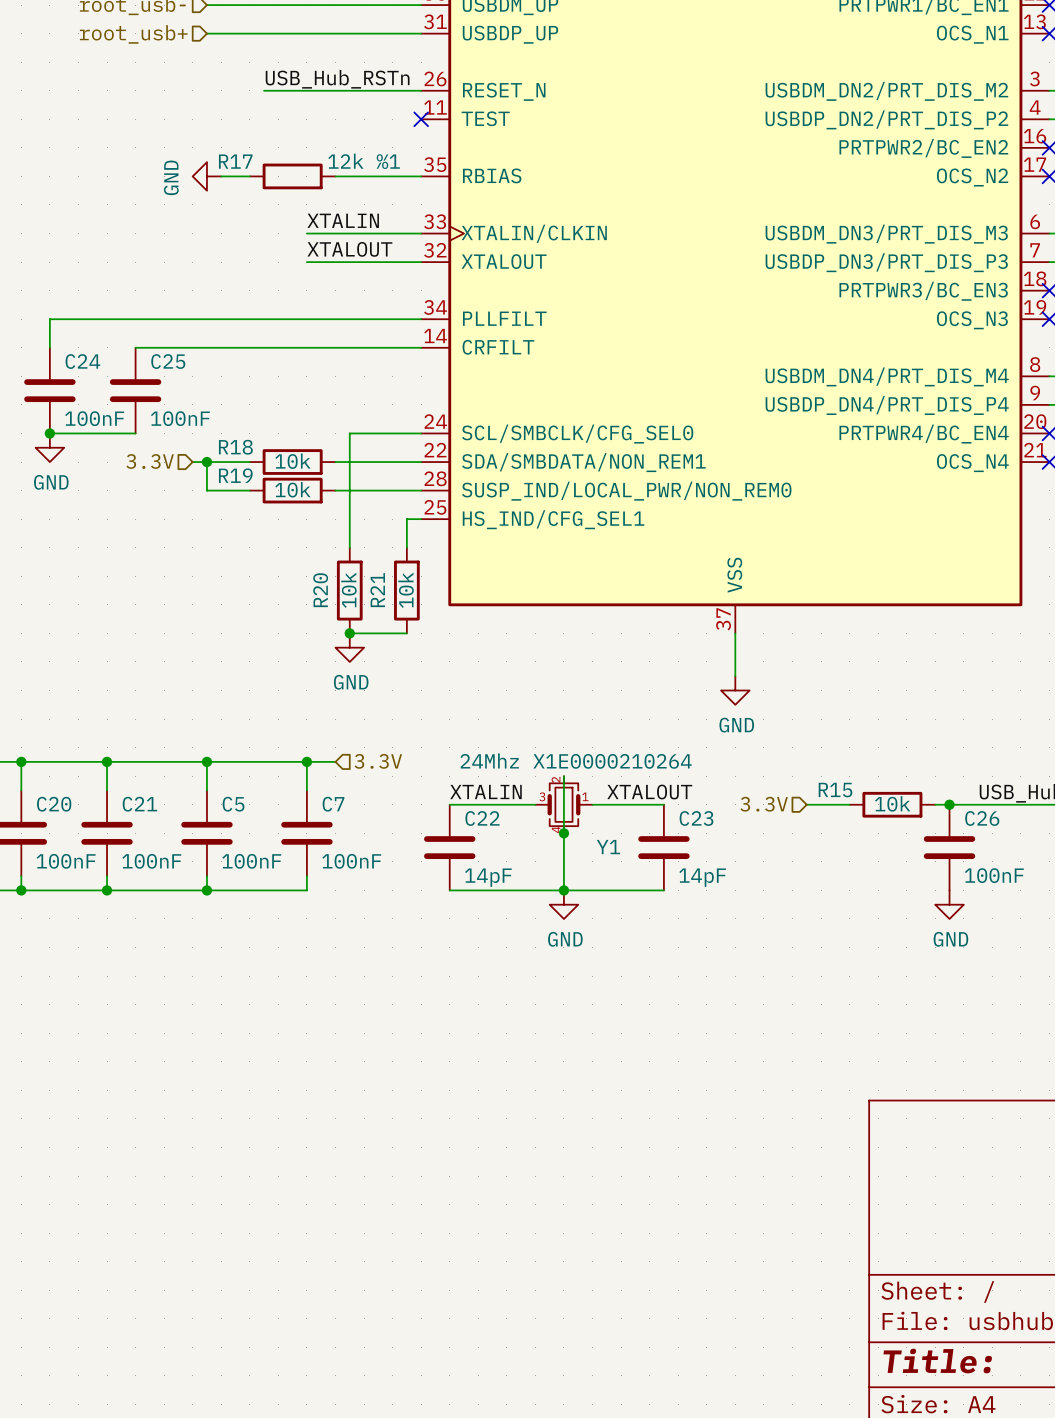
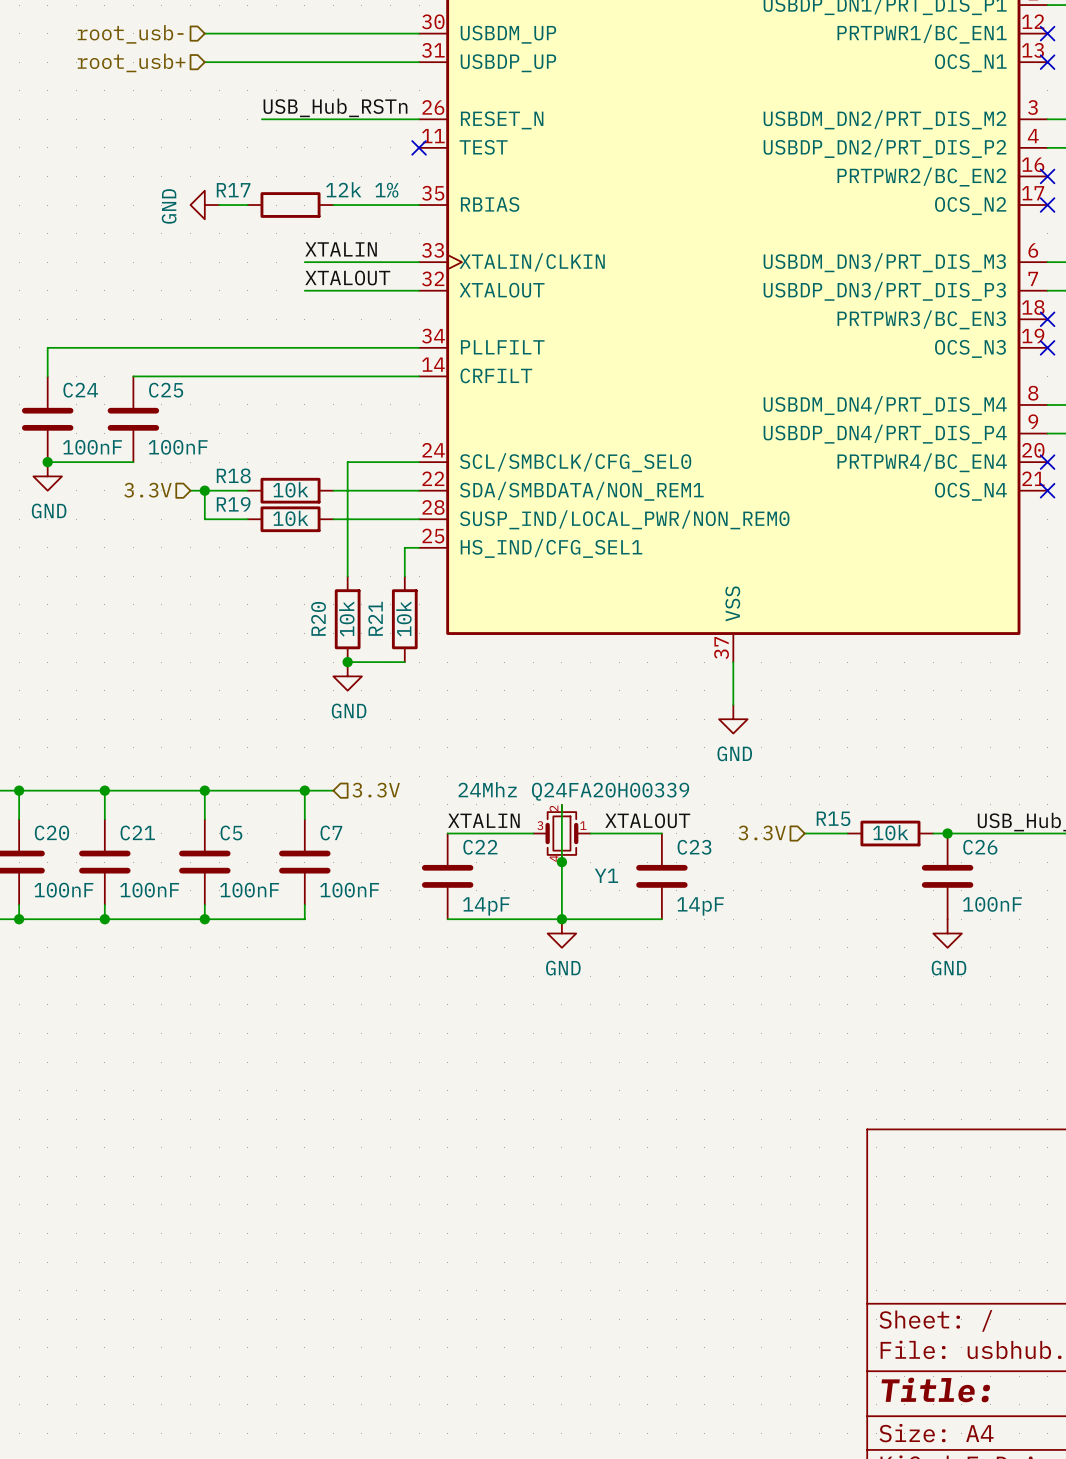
R17 value: 12k %1 (364, 161) -> 12k 1% (362, 189)
Y1 value: 24Mhz X1E0000210264 (576, 761) -> 24Mhz Q24FA20H00339 (573, 791)

